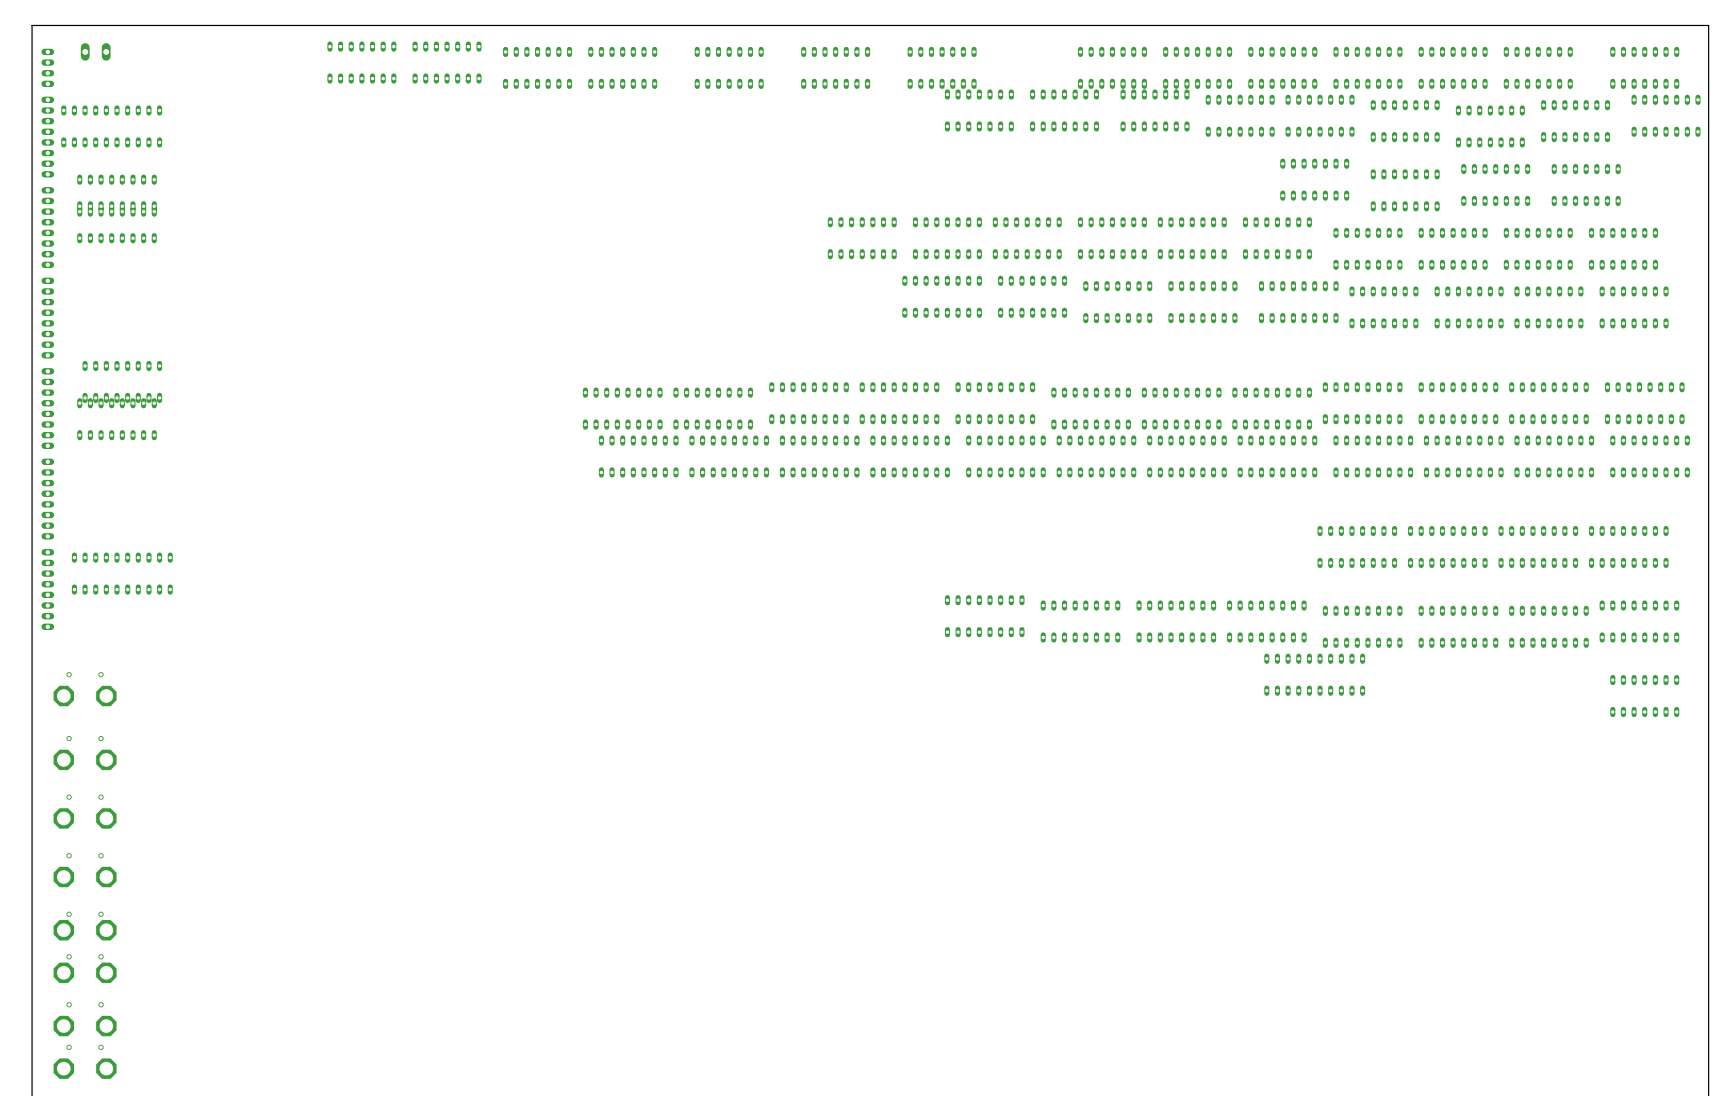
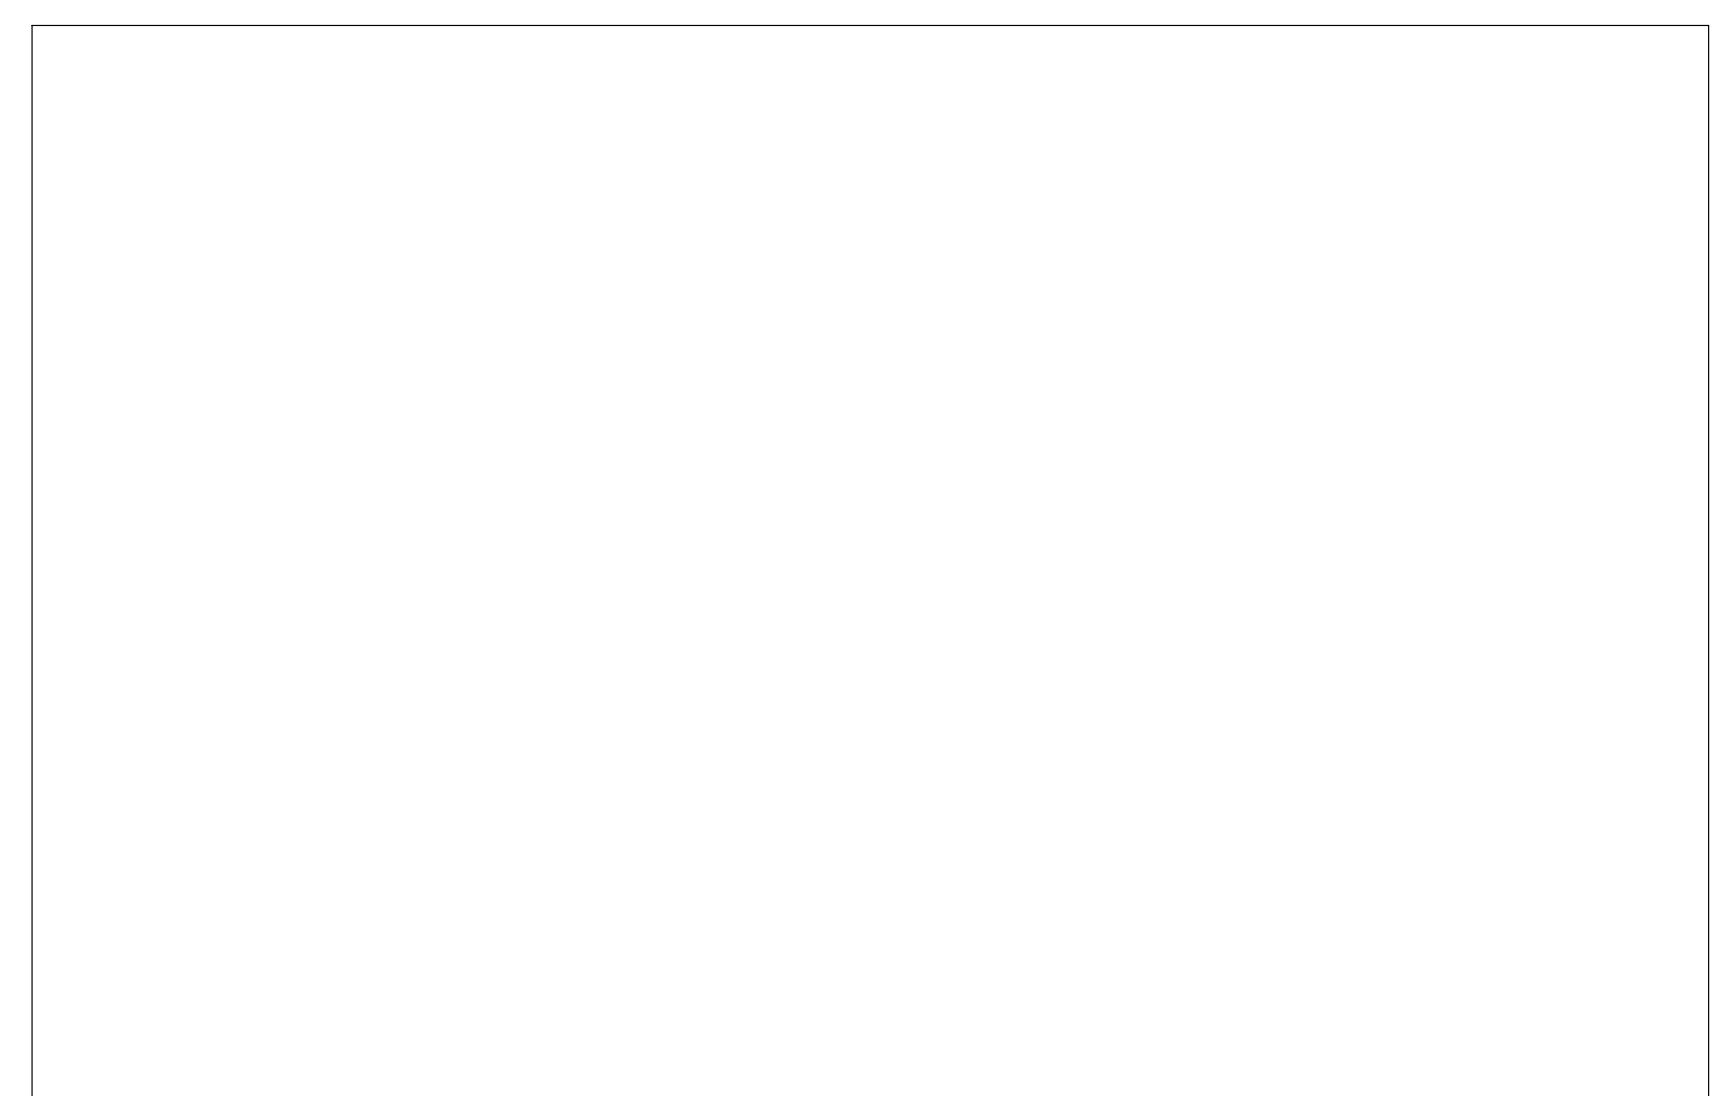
part: (95, 51) -> none
part: (361, 62) -> none
part: (447, 62) -> none
part: (47, 67) -> none
part: (537, 67) -> none
part: (622, 67) -> none
part: (729, 67) -> none
part: (835, 67) -> none
part: (942, 67) -> none
part: (1112, 67) -> none
part: (1197, 67) -> none
part: (1282, 67) -> none
part: (1367, 67) -> none
part: (1453, 67) -> none
part: (1538, 67) -> none
part: (1644, 67) -> none
part: (979, 110) -> none
part: (1064, 110) -> none
part: (1155, 110) -> none
part: (1240, 115) -> none
part: (1320, 115) -> none
part: (1666, 115) -> none
part: (1405, 121) -> none
part: (1575, 121) -> none
part: (111, 126) -> none
part: (1490, 126) -> none
part: (47, 137) -> none
part: (1314, 179) -> none
part: (1495, 184) -> none
part: (1586, 184) -> none
part: (1405, 190) -> none
part: (117, 195) -> none
part: (117, 222) -> none
part: (47, 227) -> none
part: (862, 238) -> none
part: (947, 238) -> none
part: (1027, 238) -> none
part: (1112, 238) -> none
part: (1192, 238) -> none
part: (1277, 238) -> none
part: (1367, 248) -> none
part: (1453, 248) -> none
part: (1538, 248) -> none
part: (1623, 248) -> none
part: (942, 296) -> none
part: (1032, 296) -> none
part: (1117, 302) -> none
part: (1202, 302) -> none
part: (1298, 302) -> none
part: (1383, 307) -> none
part: (1469, 307) -> none
part: (1548, 307) -> none
part: (1634, 307) -> none
part: (47, 318) -> none
part: (122, 381) -> none
part: (809, 403) -> none
part: (899, 403) -> none
part: (995, 403) -> none
part: (1362, 403) -> none
part: (1458, 403) -> none
part: (1548, 403) -> none
part: (1644, 403) -> none
part: (47, 408) -> none
part: (622, 408) -> none
part: (713, 408) -> none
part: (1091, 408) -> none
part: (1181, 408) -> none
part: (1272, 408) -> none
part: (117, 419) -> none
part: (638, 456) -> none
part: (729, 456) -> none
part: (819, 456) -> none
part: (910, 456) -> none
part: (1005, 456) -> none
part: (1096, 456) -> none
part: (1186, 456) -> none
part: (1277, 456) -> none
part: (1373, 456) -> none
part: (1463, 456) -> none
part: (1554, 456) -> none
part: (1650, 456) -> none
part: (47, 499) -> none
part: (1357, 546) -> none
part: (1447, 546) -> none
part: (1538, 546) -> none
part: (1628, 546) -> none
part: (122, 573) -> none
part: (47, 589) -> none
part: (984, 616) -> none
part: (1080, 621) -> none
part: (1176, 621) -> none
part: (1266, 621) -> none
part: (1639, 621) -> none
part: (1362, 626) -> none
part: (1458, 626) -> none
part: (1548, 626) -> none
part: (85, 674) -> none
part: (1314, 674) -> none
part: (85, 696) -> none
part: (1644, 696) -> none
part: (85, 738) -> none
part: (85, 759) -> none
part: (85, 797) -> none
part: (85, 818) -> none
part: (85, 855) -> none
part: (85, 877) -> none
part: (85, 914) -> none
part: (85, 930) -> none
part: (85, 956) -> none
part: (85, 972) -> none
part: (85, 1004) -> none
part: (85, 1026) -> none
part: (85, 1047) -> none
part: (85, 1068) -> none

